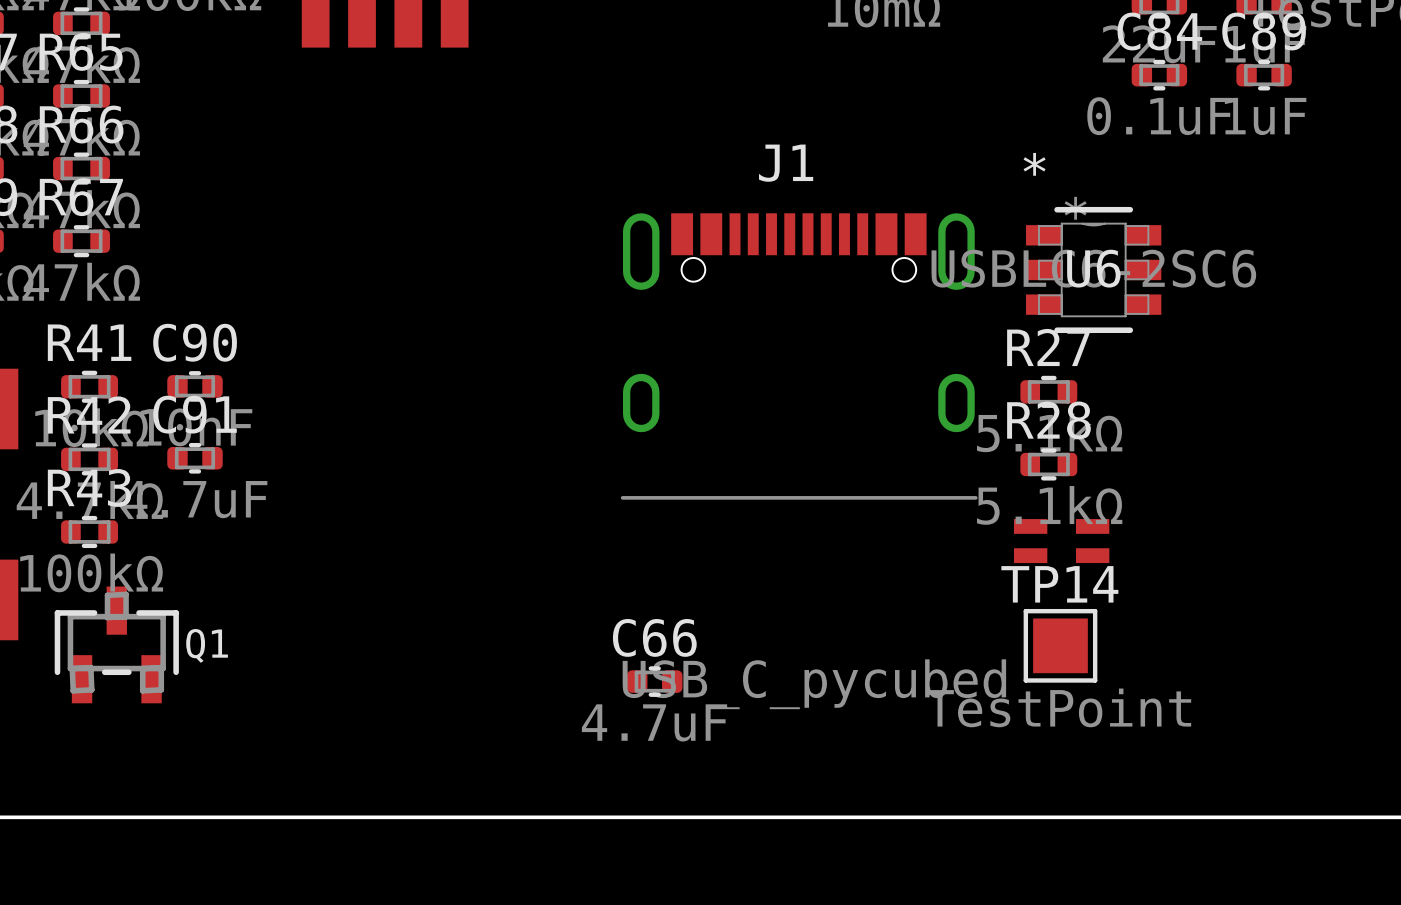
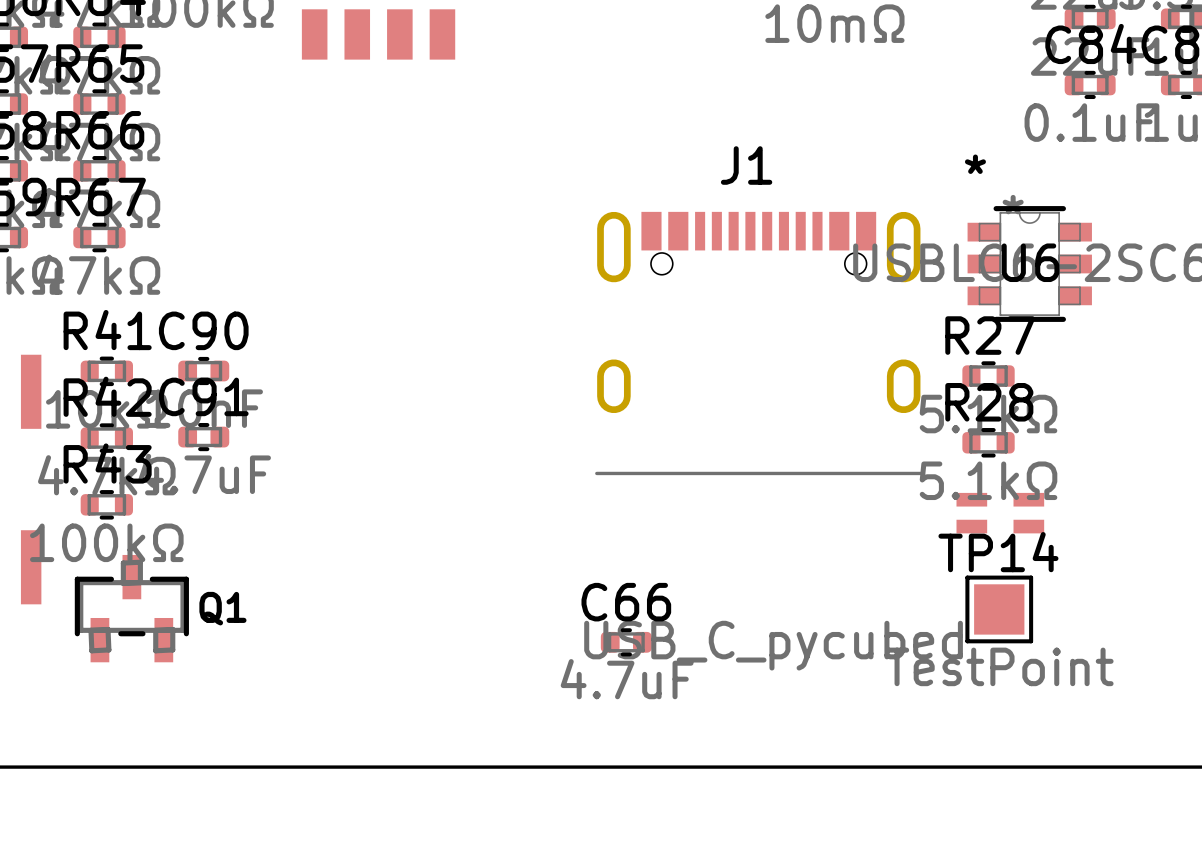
U6 footprint: [1026, 206, 1162, 333] -> [967, 206, 1092, 322]
Q1 footprint: [54, 586, 179, 704] -> [74, 554, 189, 663]

